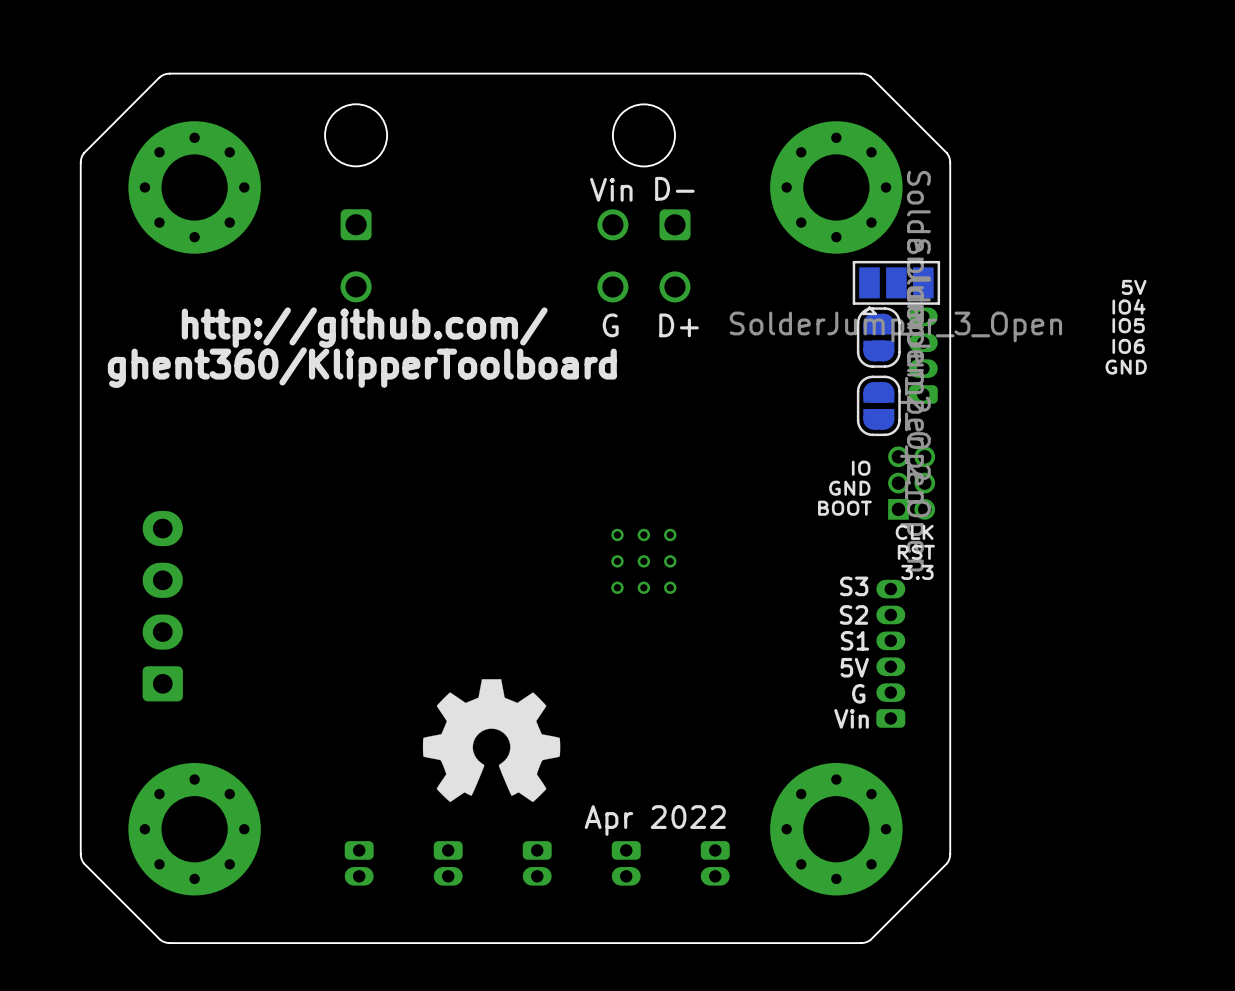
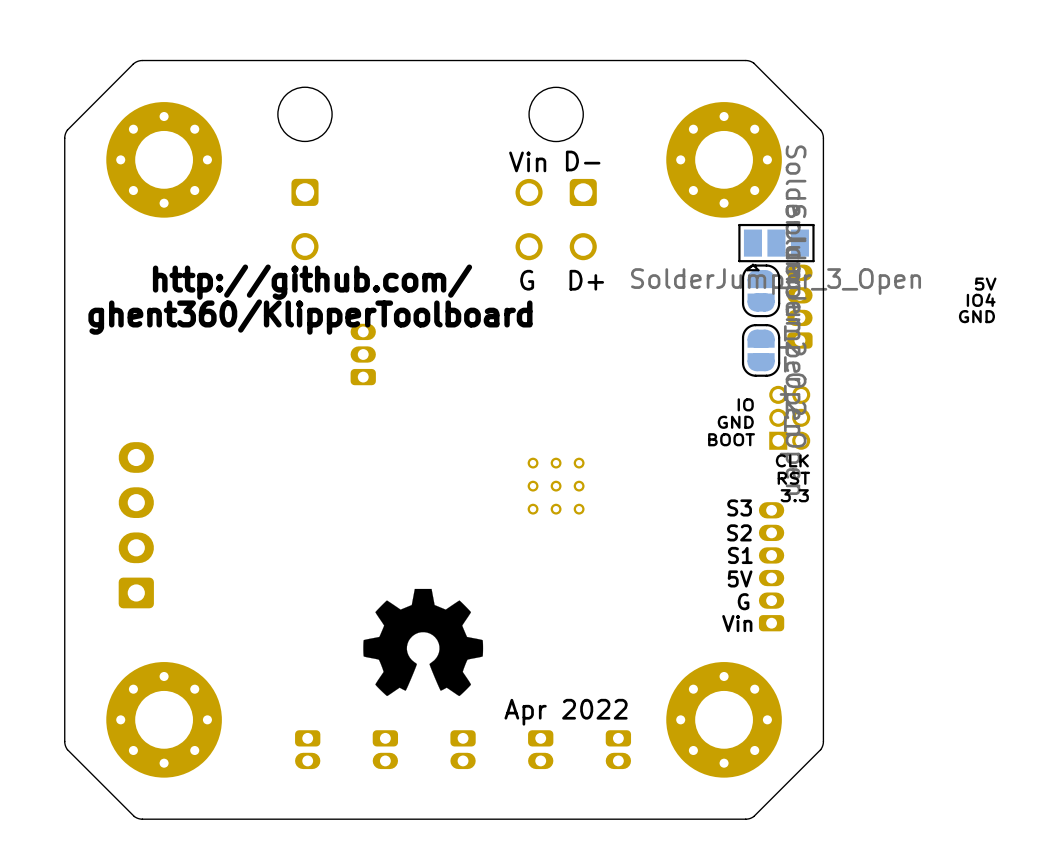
text: 5V (1134, 287) -> none
text: IO4 (1128, 306) -> none
text: IO5 (1128, 325) -> 5V (985, 284)
text: IO6 (1128, 346) -> IO4 (981, 300)
part: none -> (363, 354)

